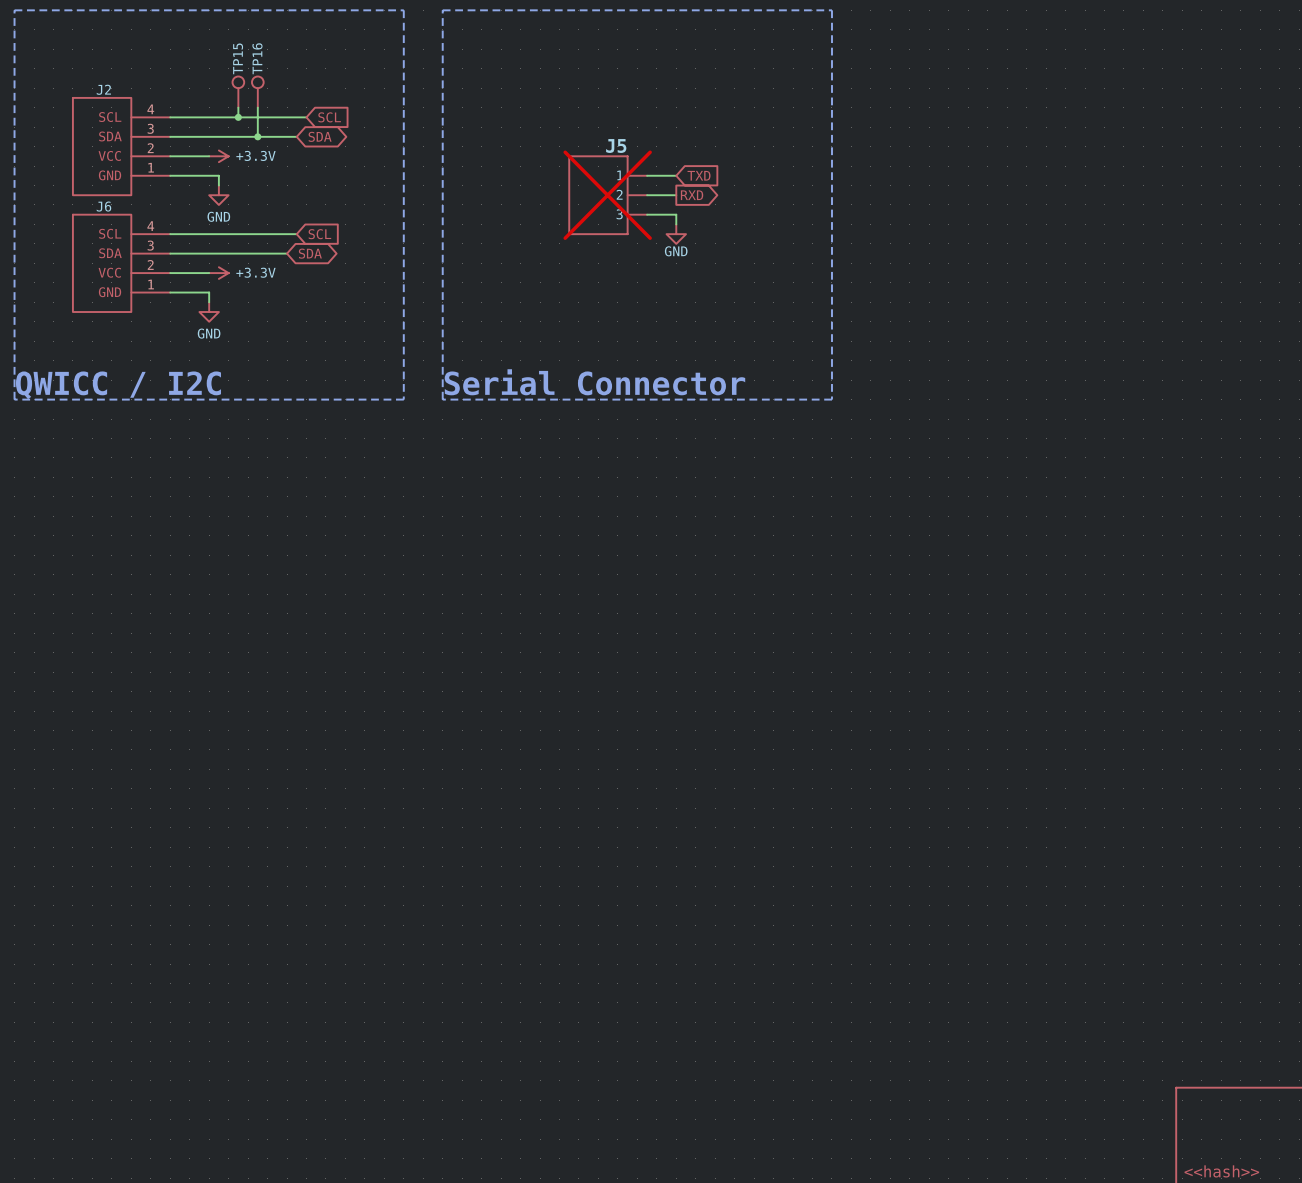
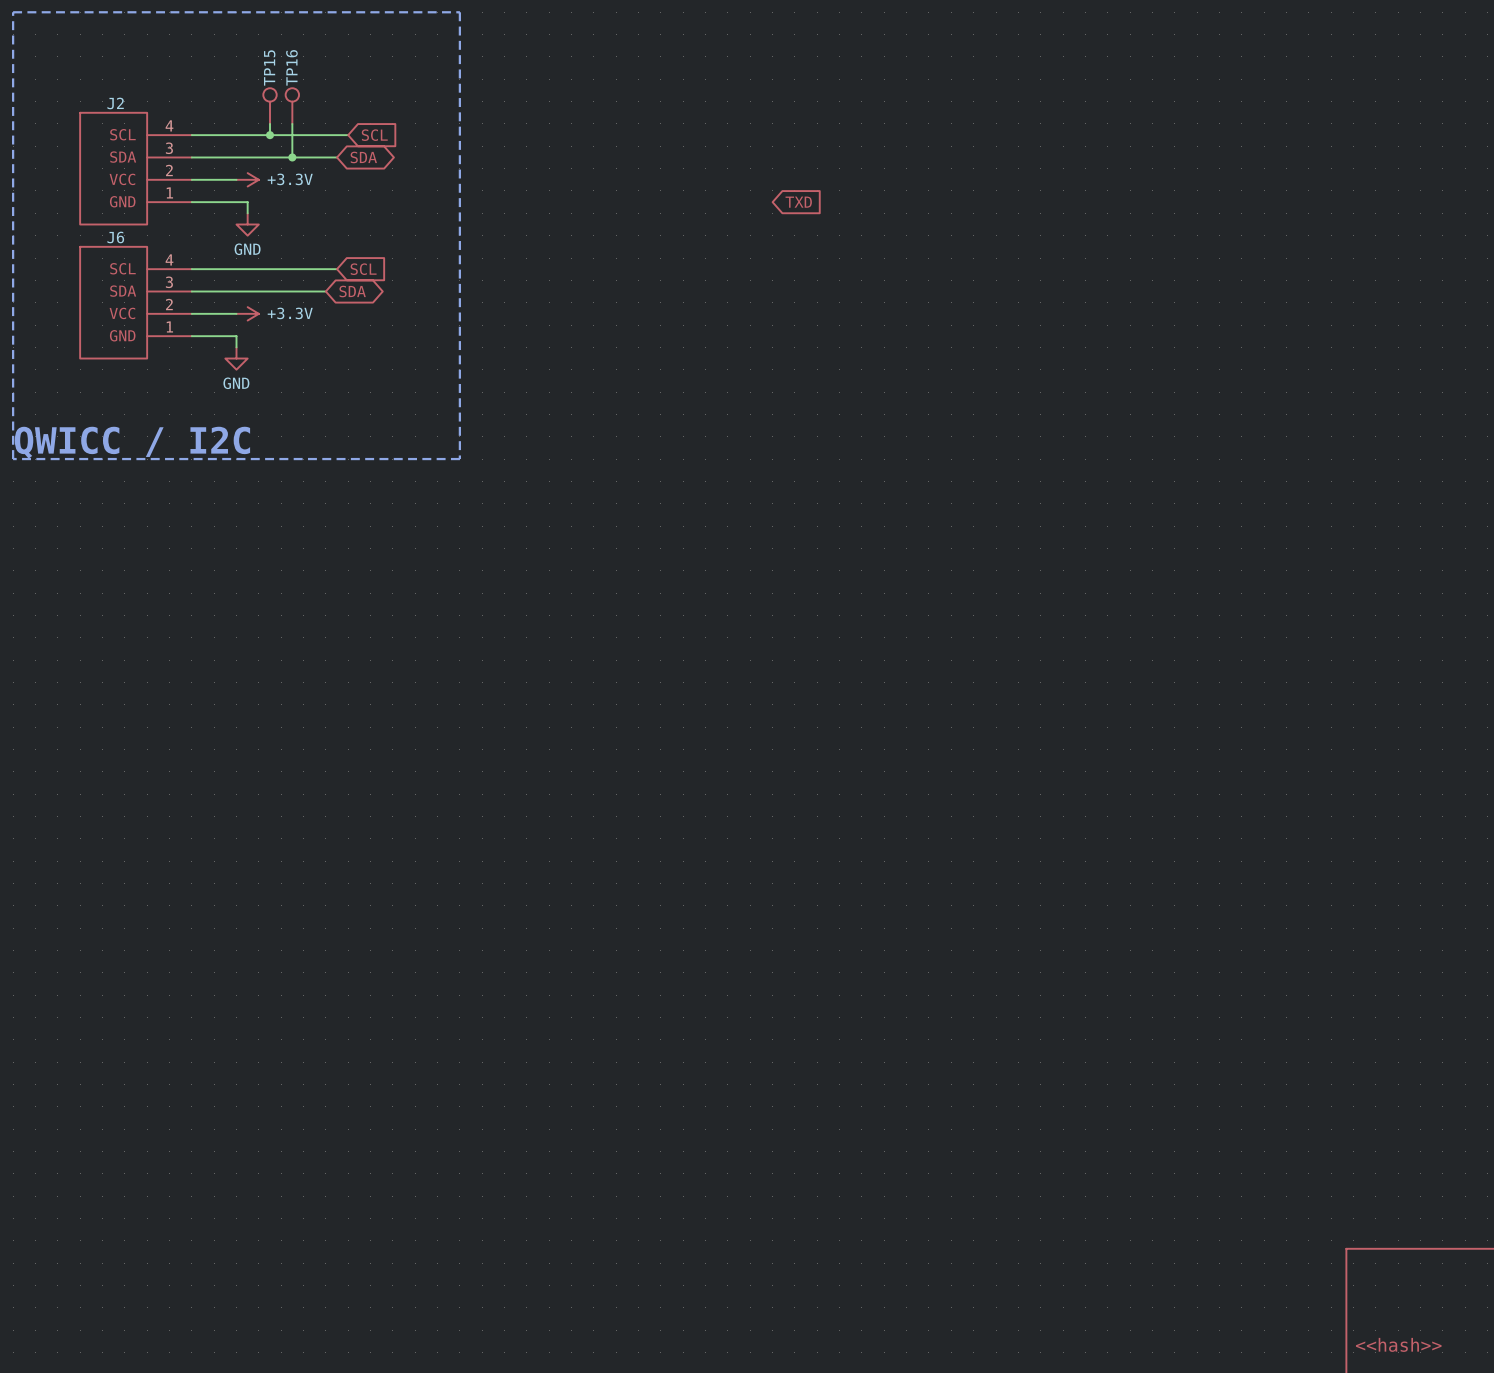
line: (442, 10) (831, 10) (831, 399) (442, 399) (442, 10) -> none
wire: (647, 175) (676, 175) -> none
J5: (607, 195) -> none
wire: (647, 195) (676, 195) -> none
global label: RXD (692, 195) -> none
wire: (647, 214) (676, 214) (676, 224) -> none
power symbol: GND (676, 234) -> none
text: Serial Connector (594, 382) -> none

